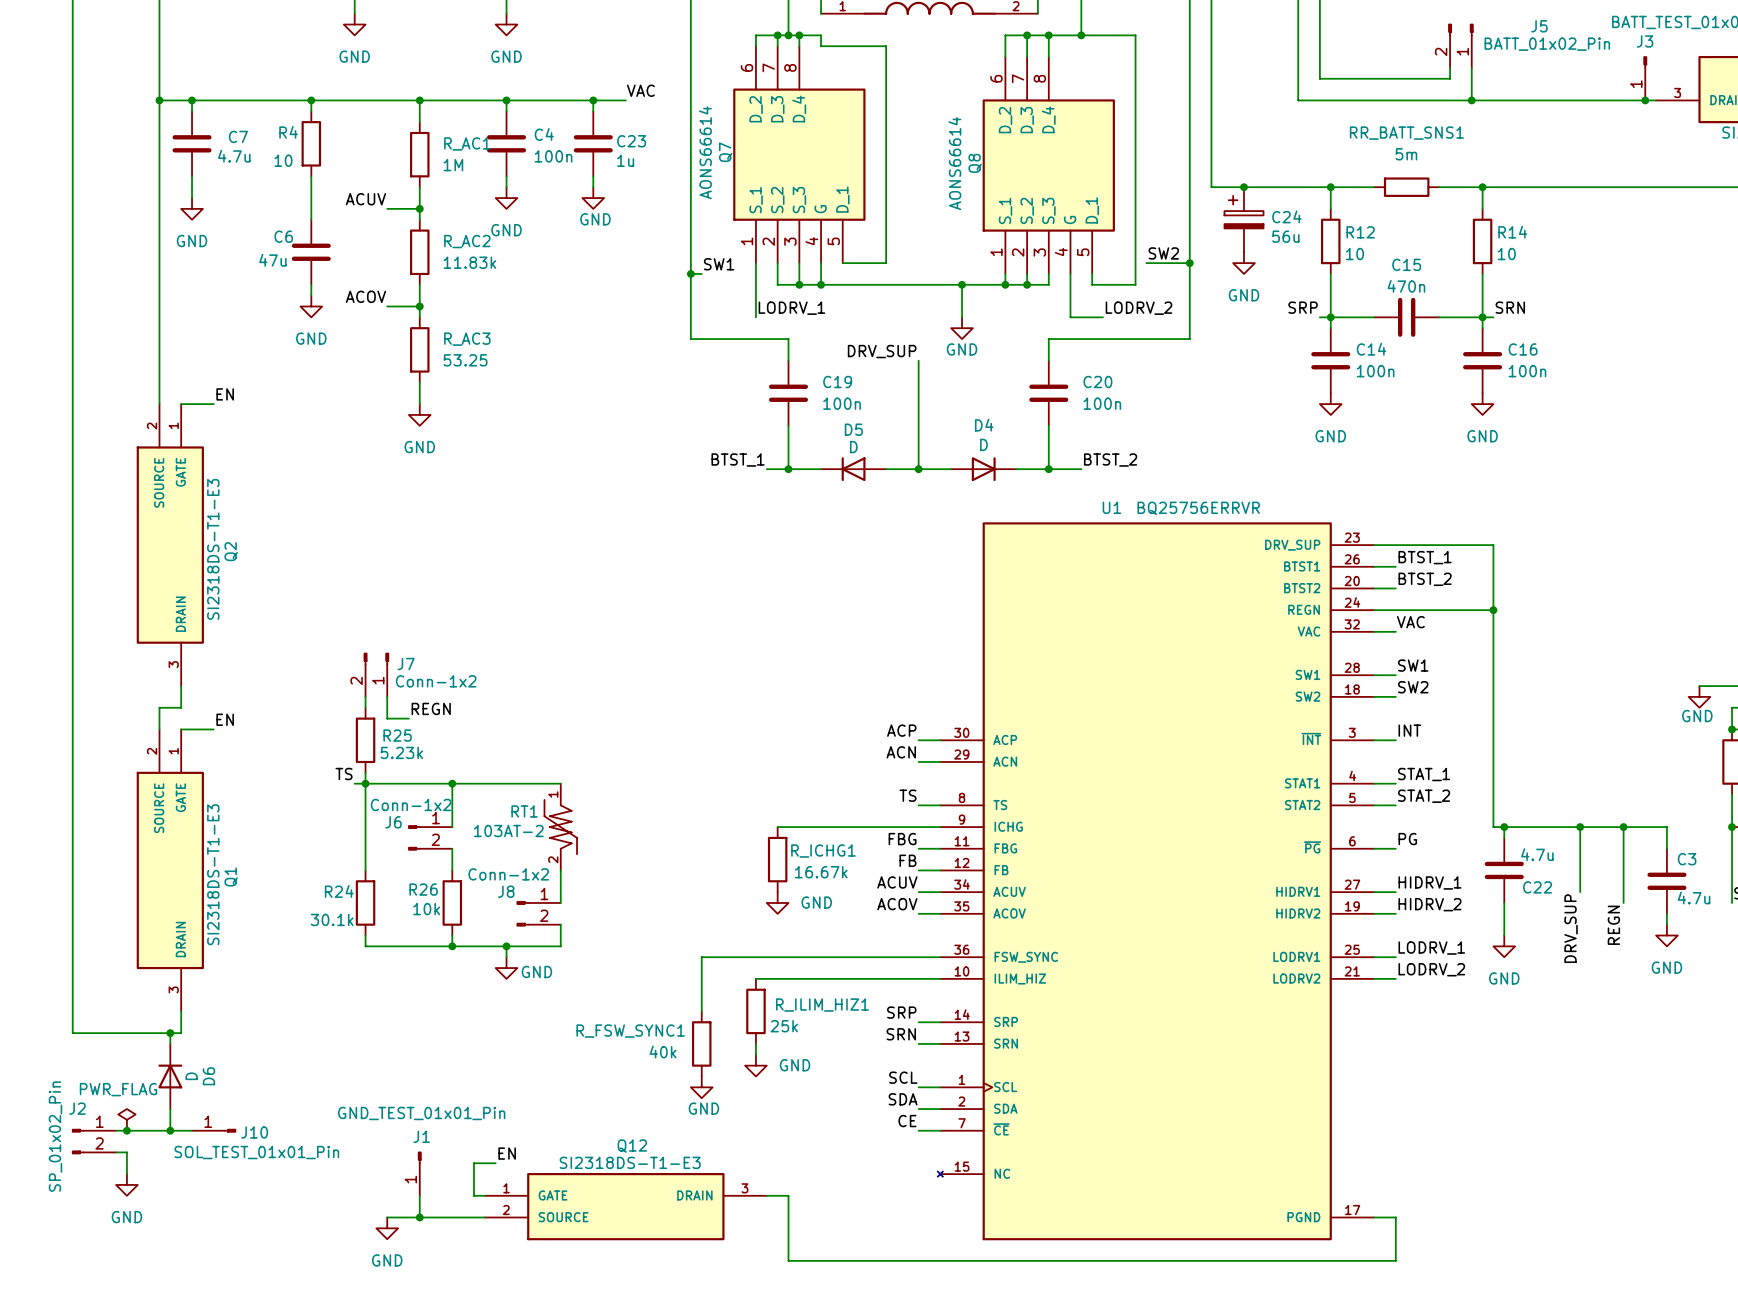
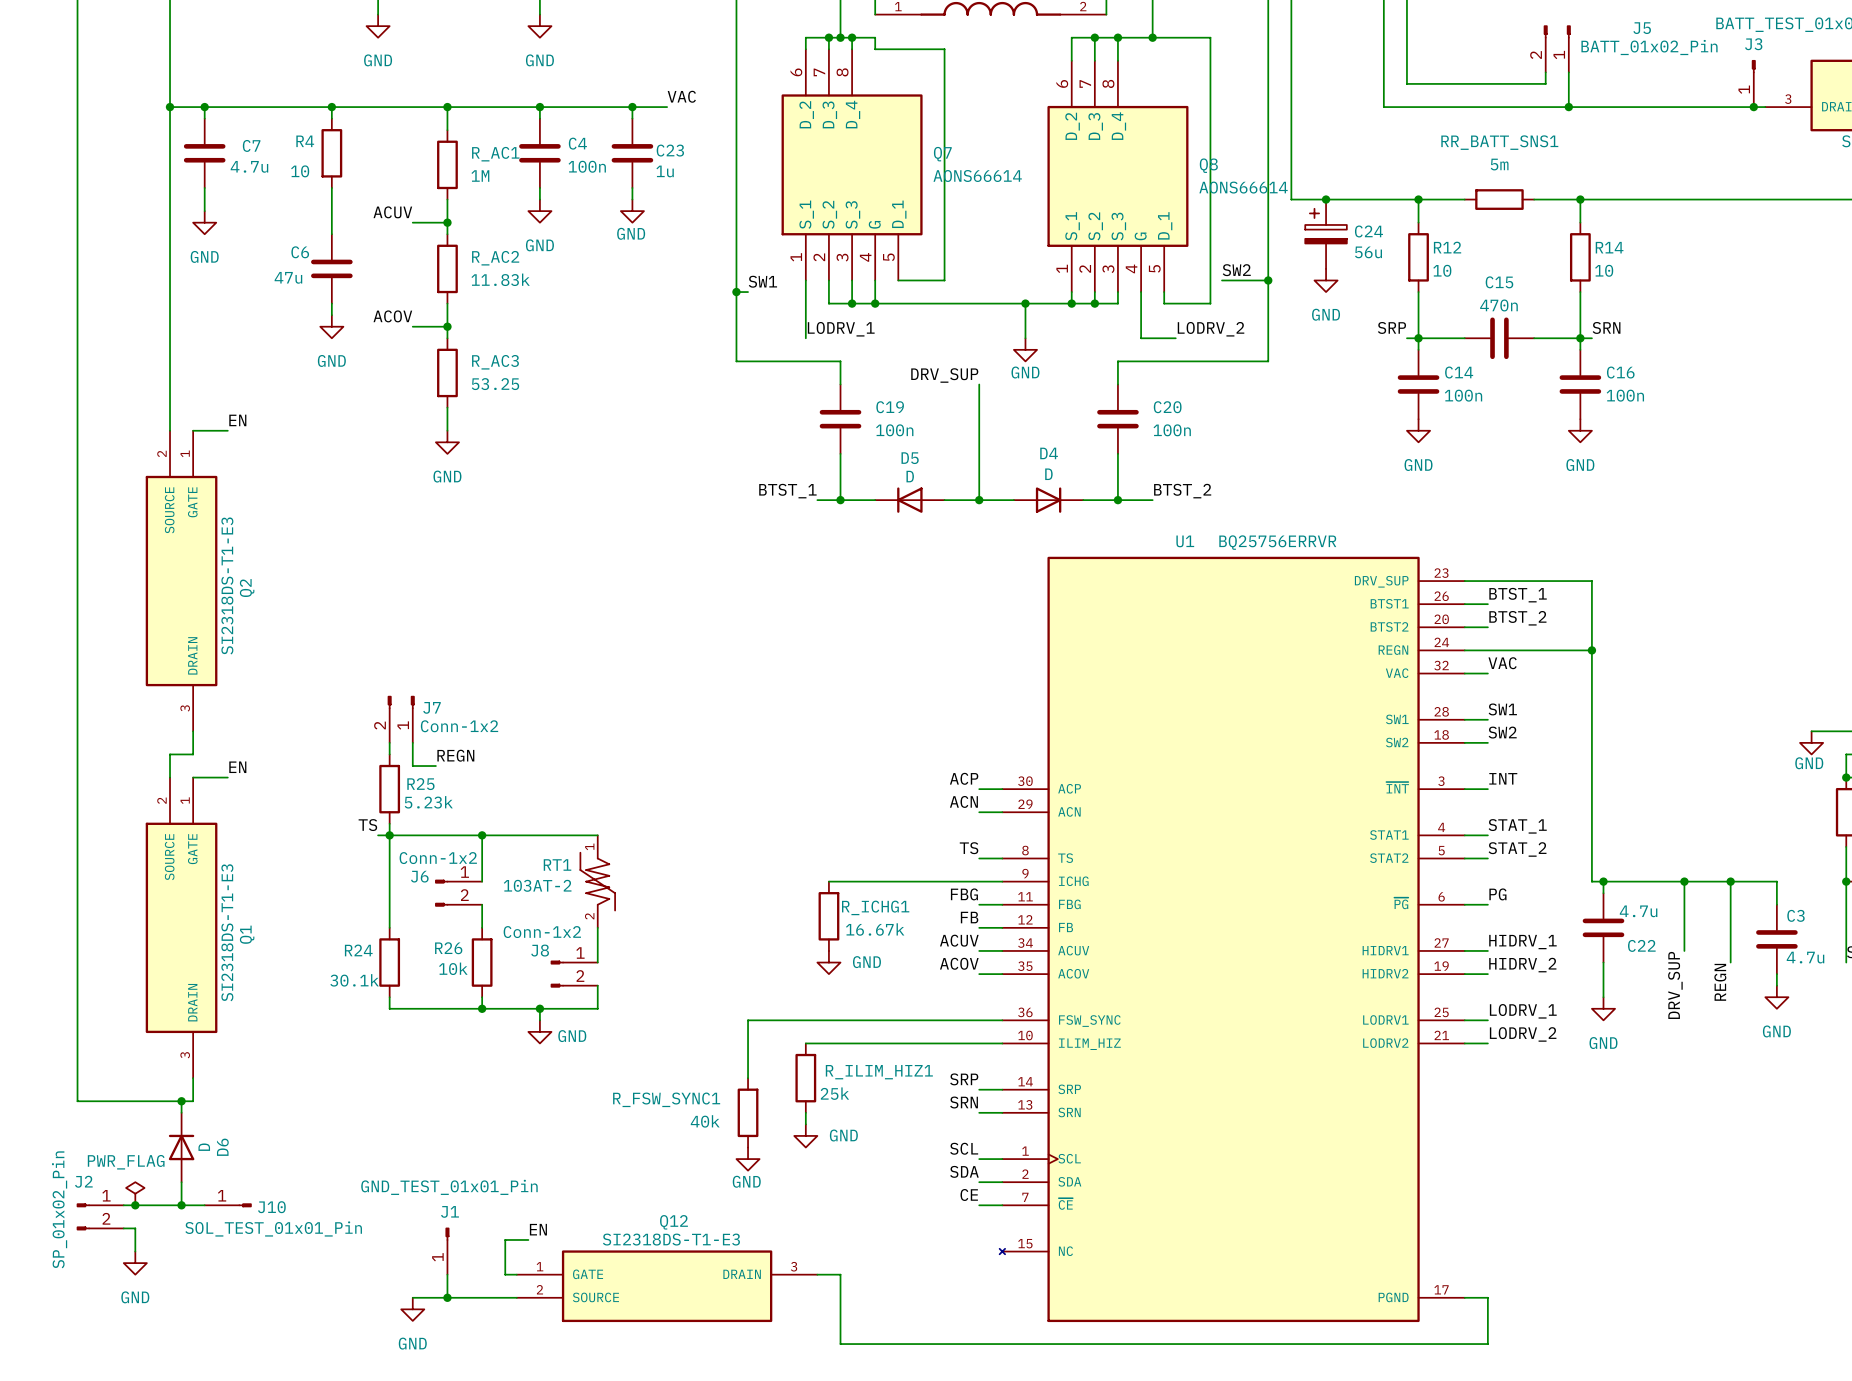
Q7 value rotation: 0° (705, 152) -> 90° clockwise (977, 175)
Q7 value position: AONS66614 (705, 152) -> AONS66614 (977, 175)
Q7 name rotation: 0° (725, 152) -> 90° clockwise (942, 154)
Q7 name position: Q7 (725, 152) -> Q7 (942, 154)
Q8 value rotation: 0° (954, 163) -> 90° clockwise (1243, 187)
Q8 value position: AONS66614 (954, 163) -> AONS66614 (1243, 187)
Q8 name rotation: 0° (975, 163) -> 90° clockwise (1208, 165)
Q8 name position: Q8 (975, 163) -> Q8 (1208, 165)

